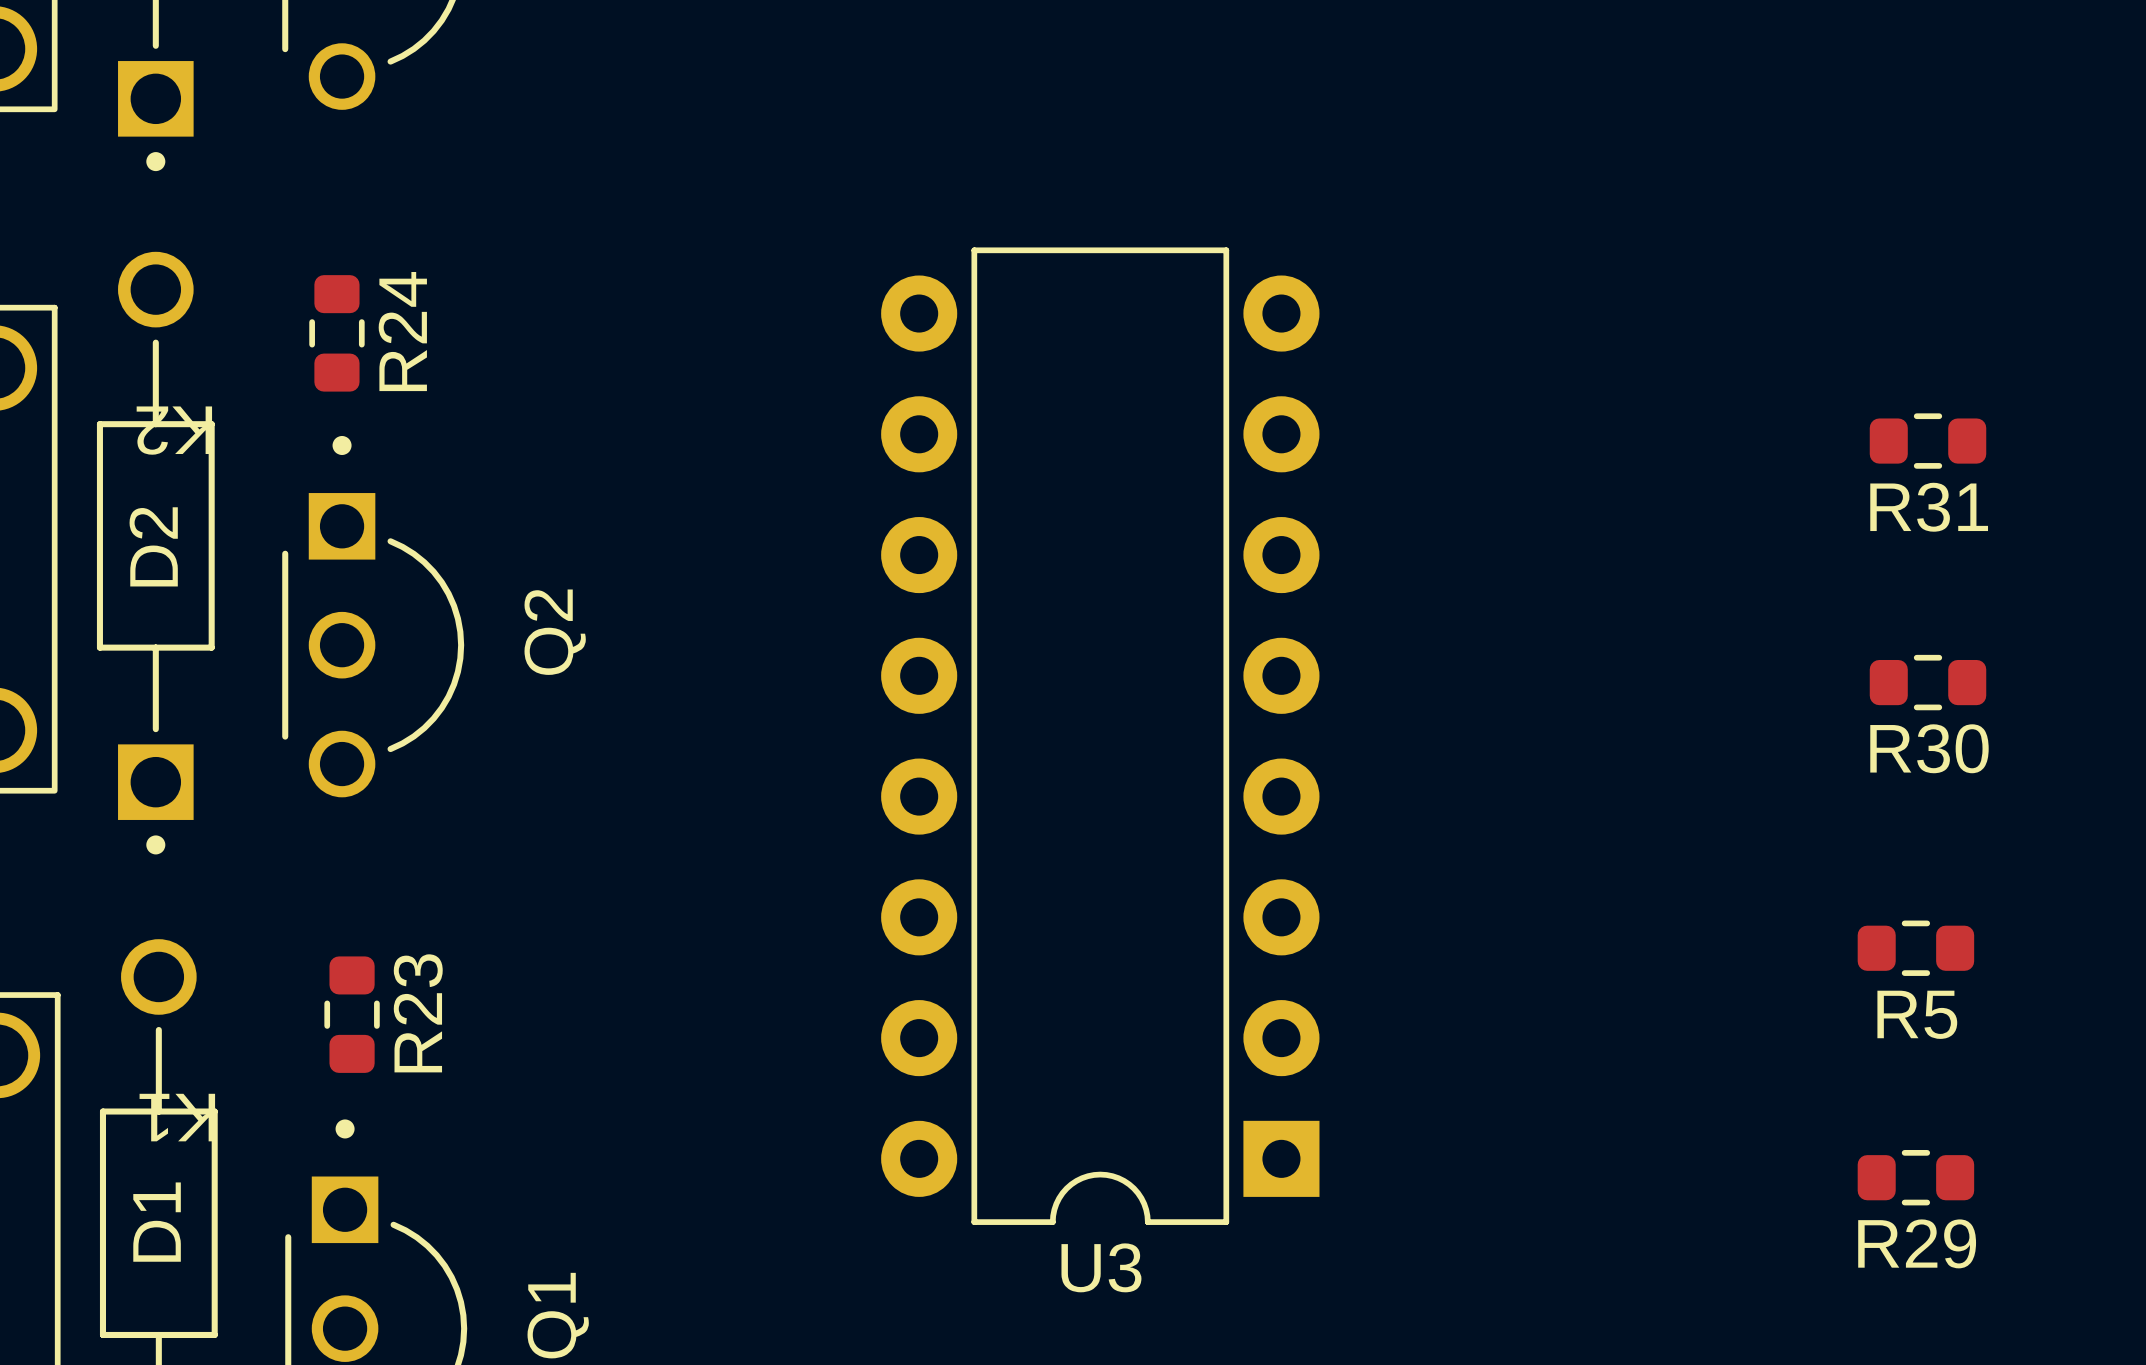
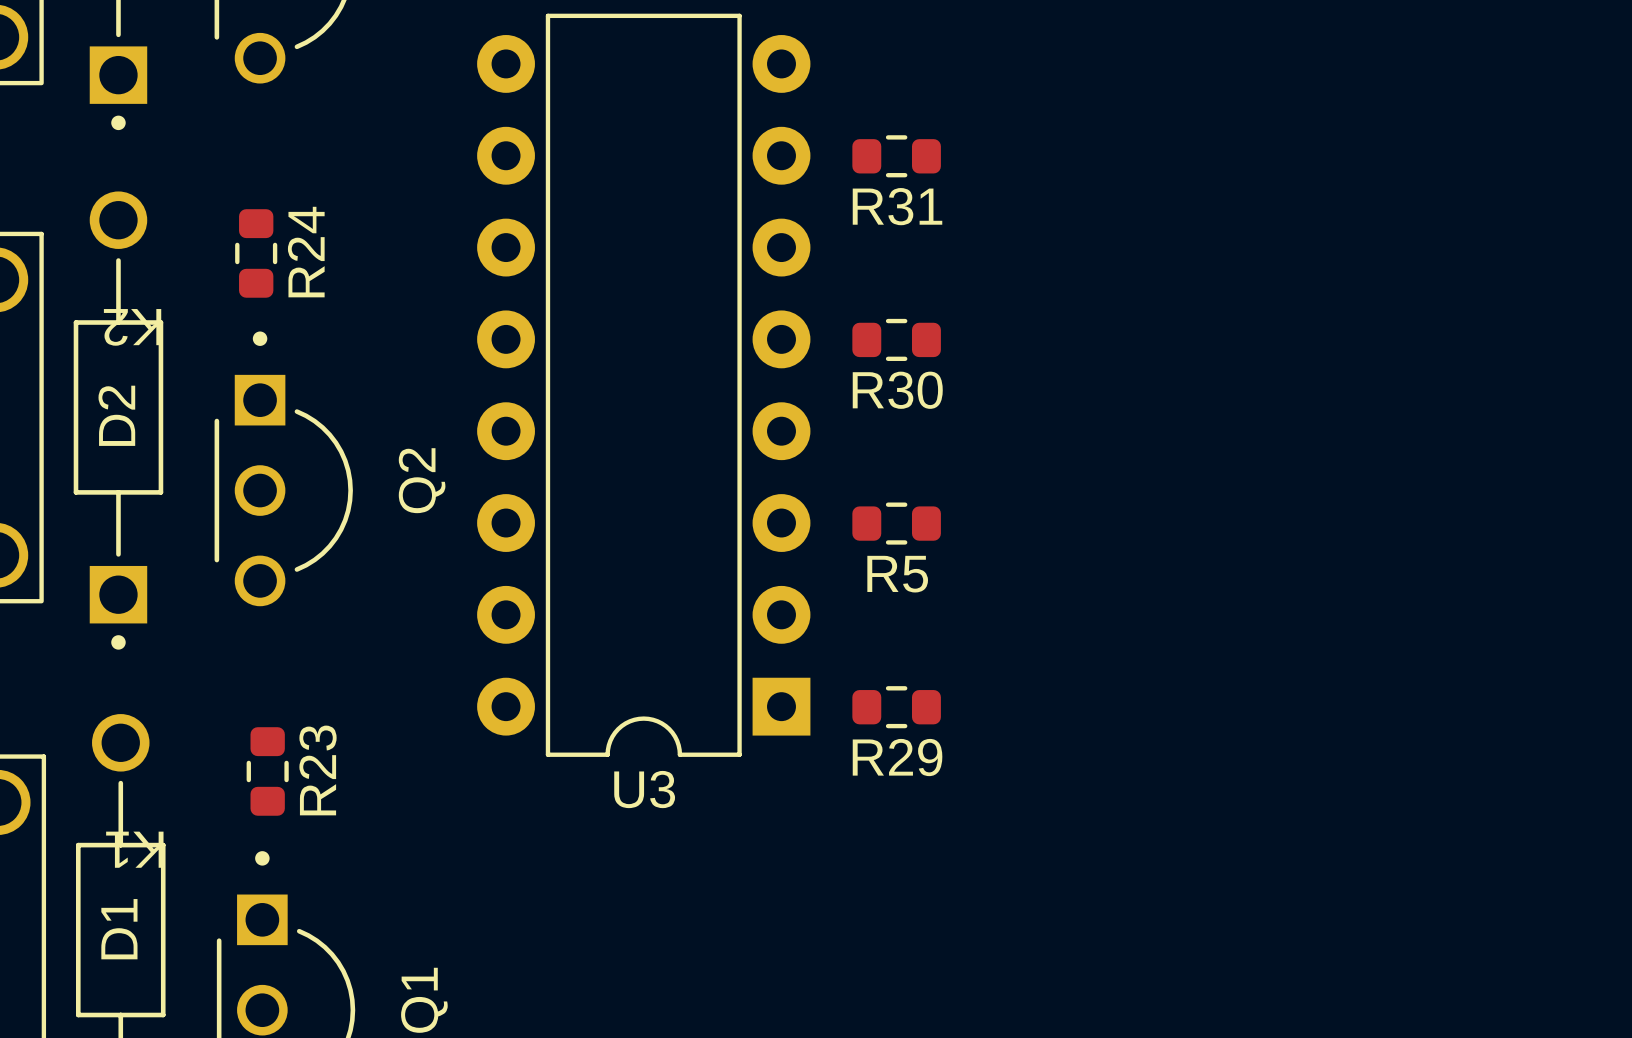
R31 position: (1928, 441) -> (896, 156)
R30 position: (1928, 682) -> (896, 339)
U3 position: (1100, 736) -> (643, 385)
R5 position: (1915, 948) -> (896, 523)
R29 position: (1915, 1177) -> (896, 707)

